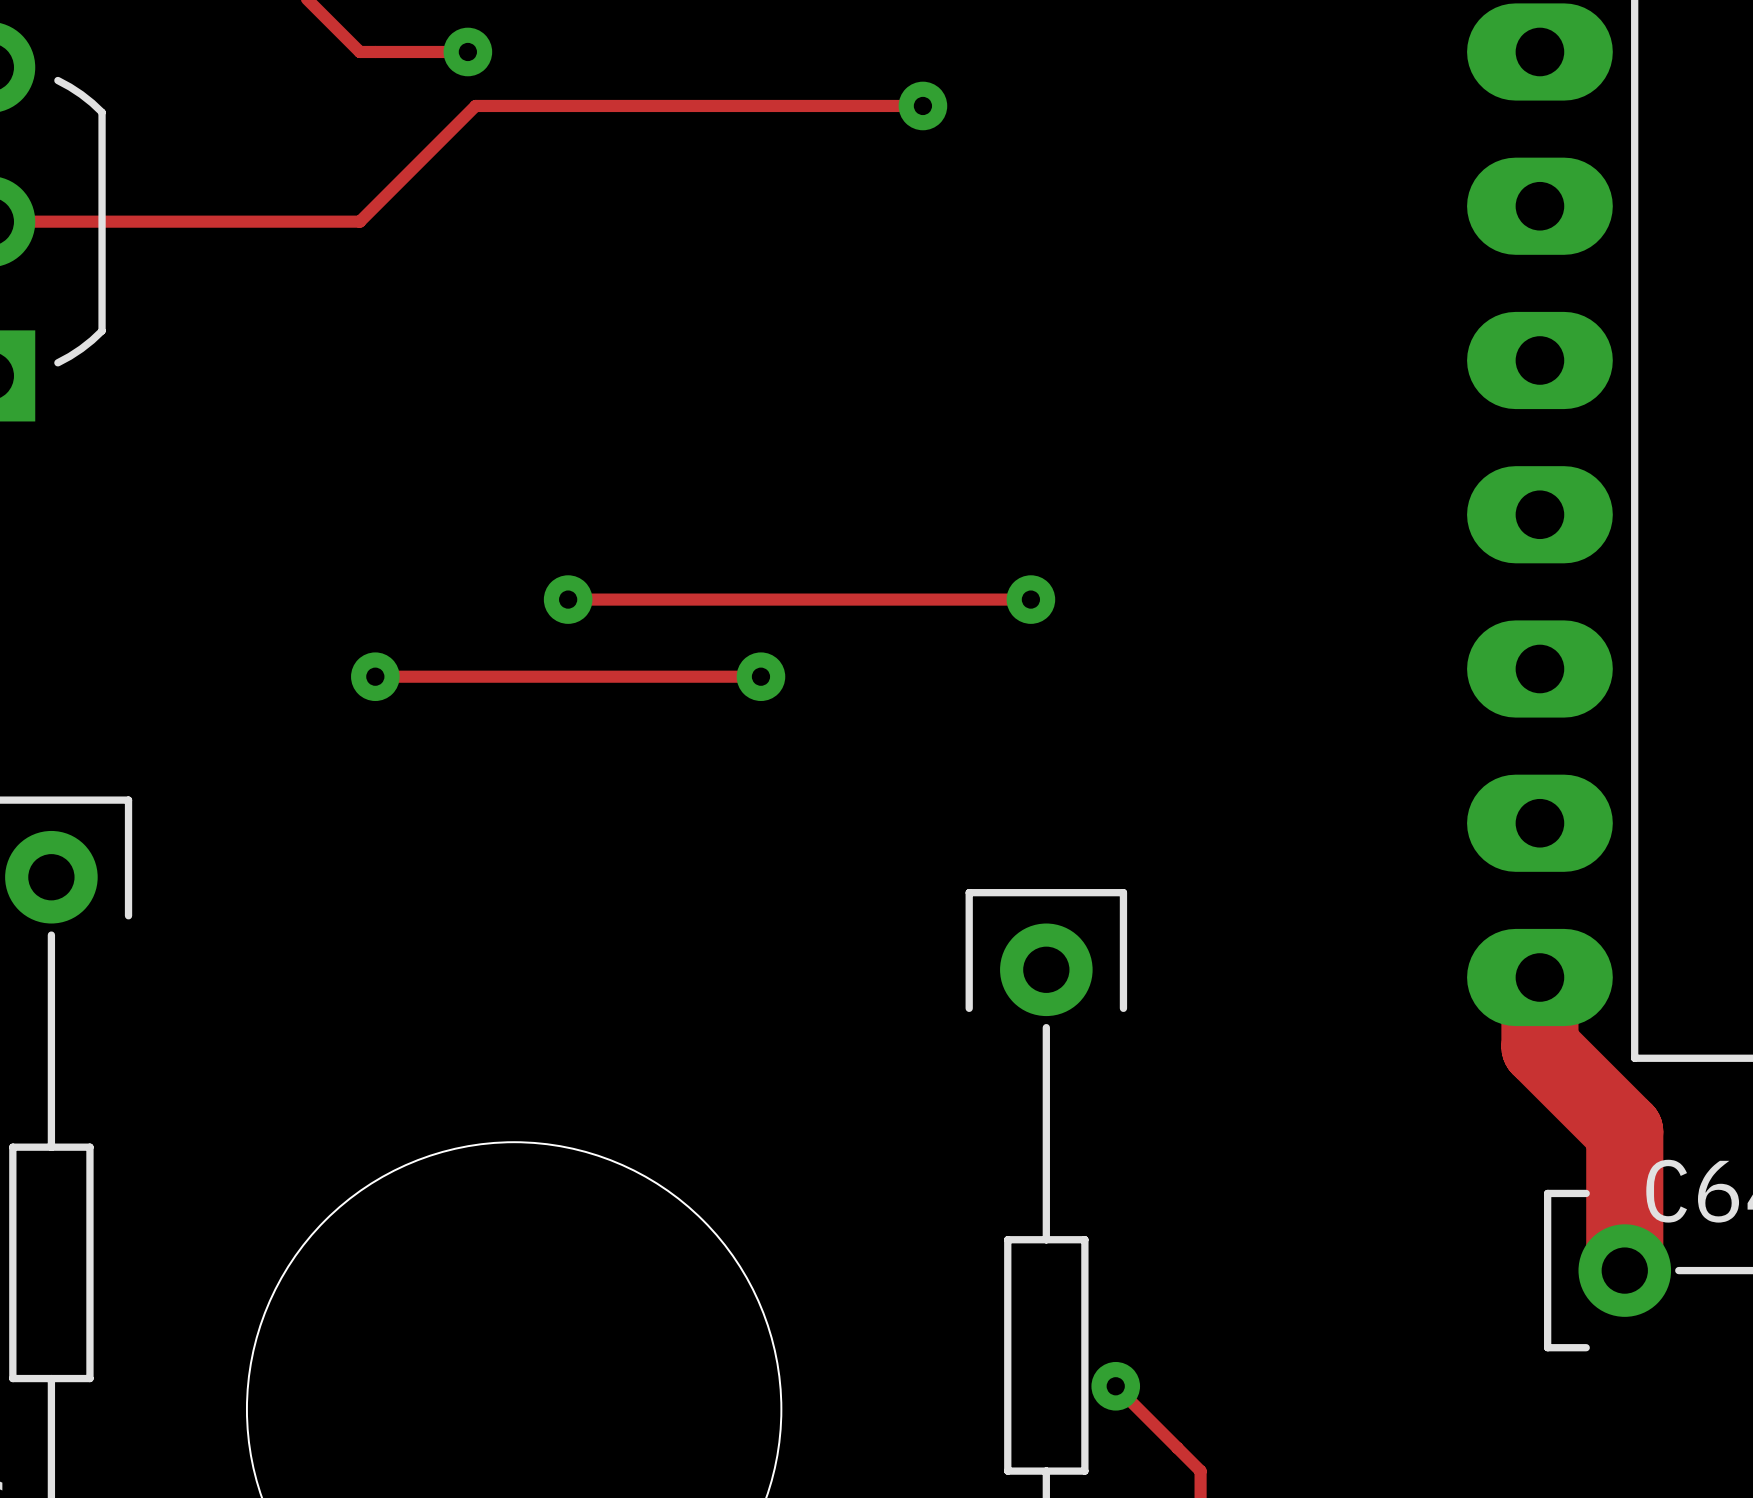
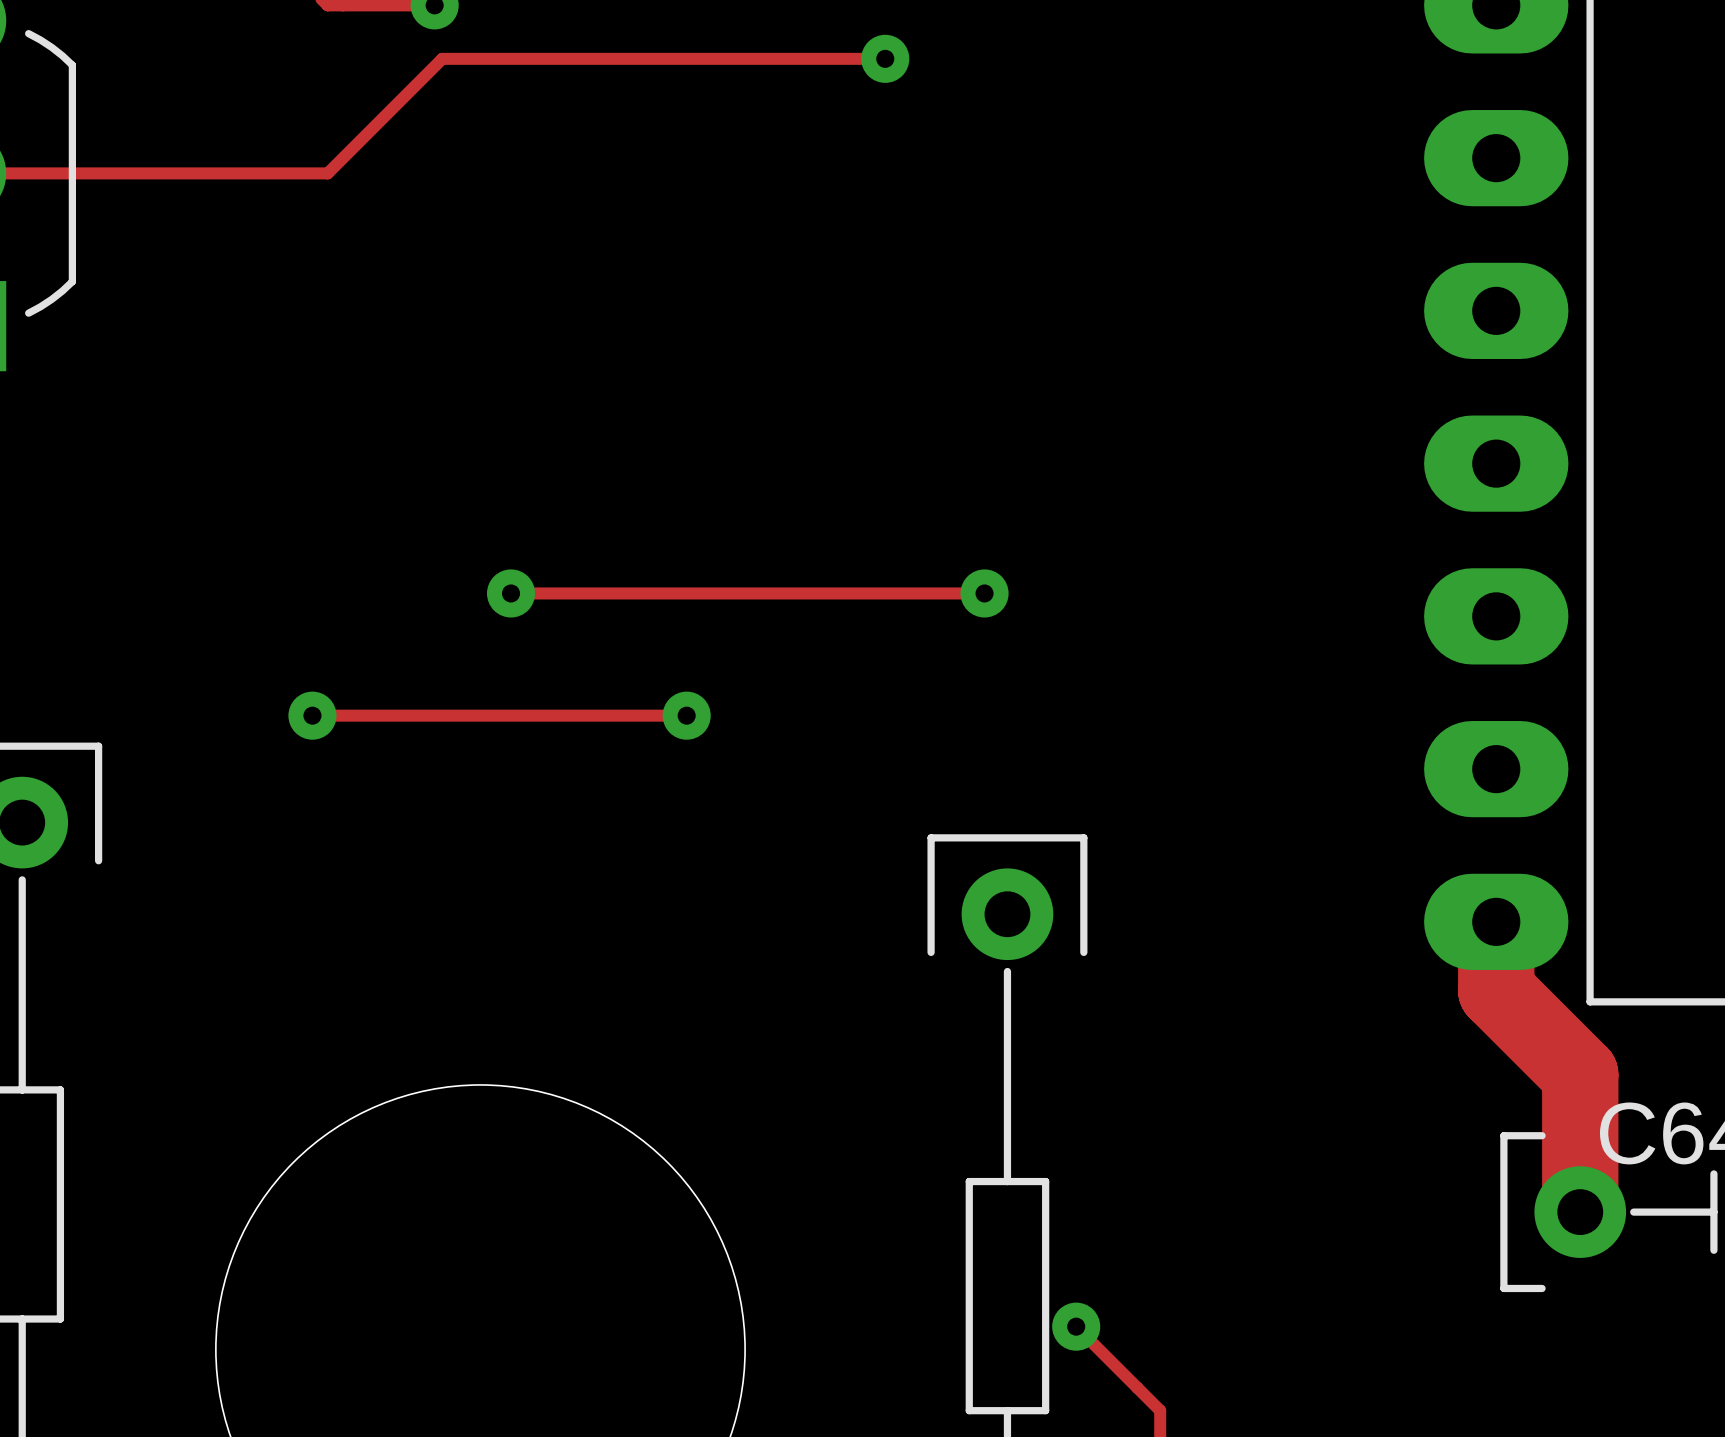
track: (568, 599) (1030, 599) -> none
via position: (568, 599) -> (511, 593)
via position: (1030, 599) -> (984, 593)
track: none -> (511, 593) (984, 593)
track: (375, 676) (760, 676) -> none
via: (375, 676) -> none
via position: (760, 676) -> (686, 715)
track: none -> (312, 715) (686, 715)
via: none -> (312, 715)

